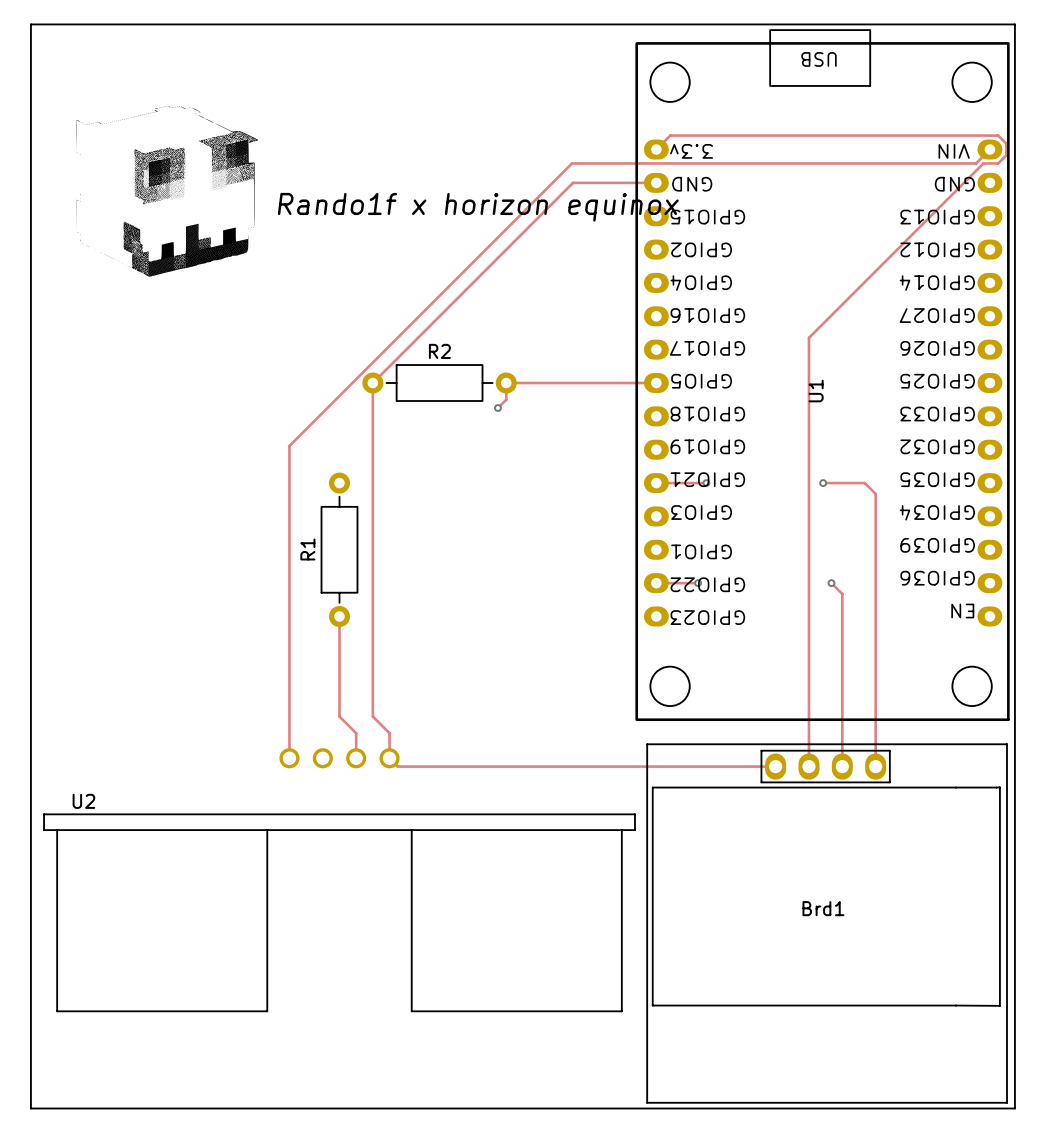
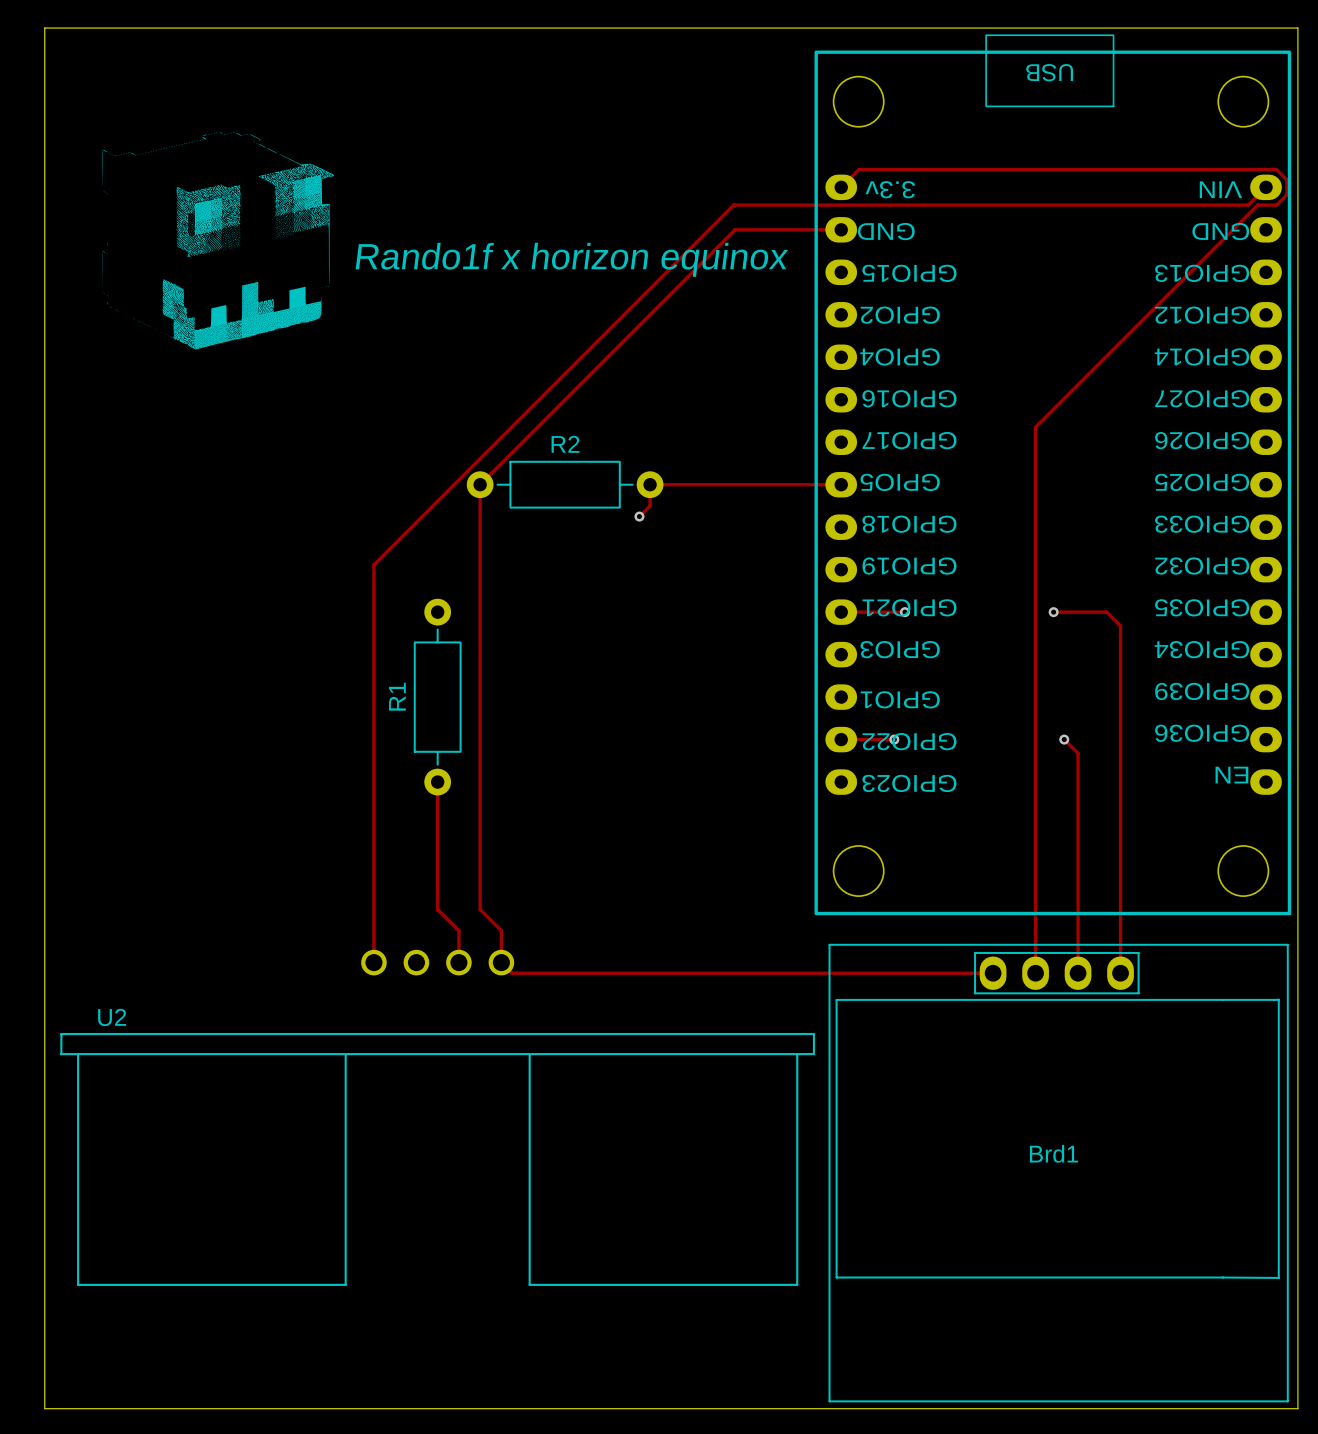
U1 name: U1 (816, 391) -> none

